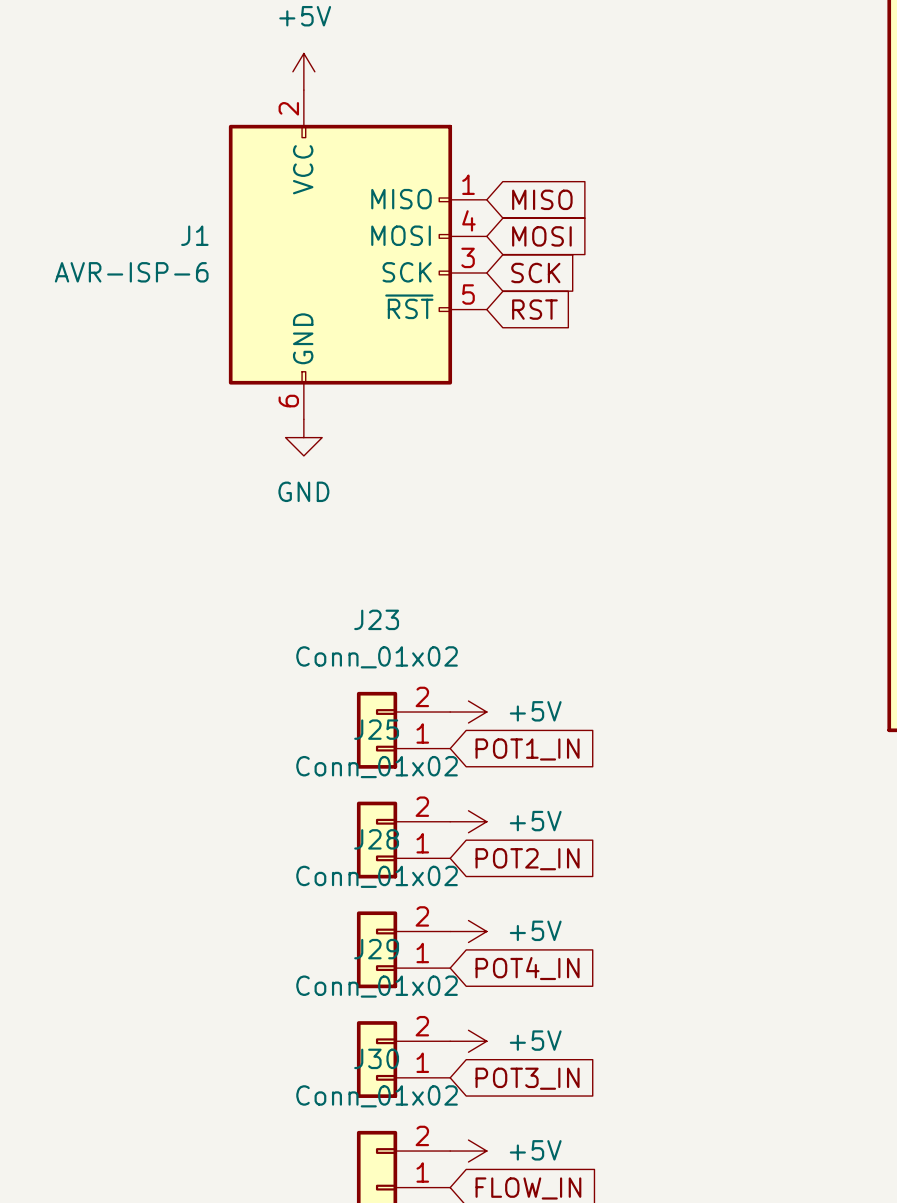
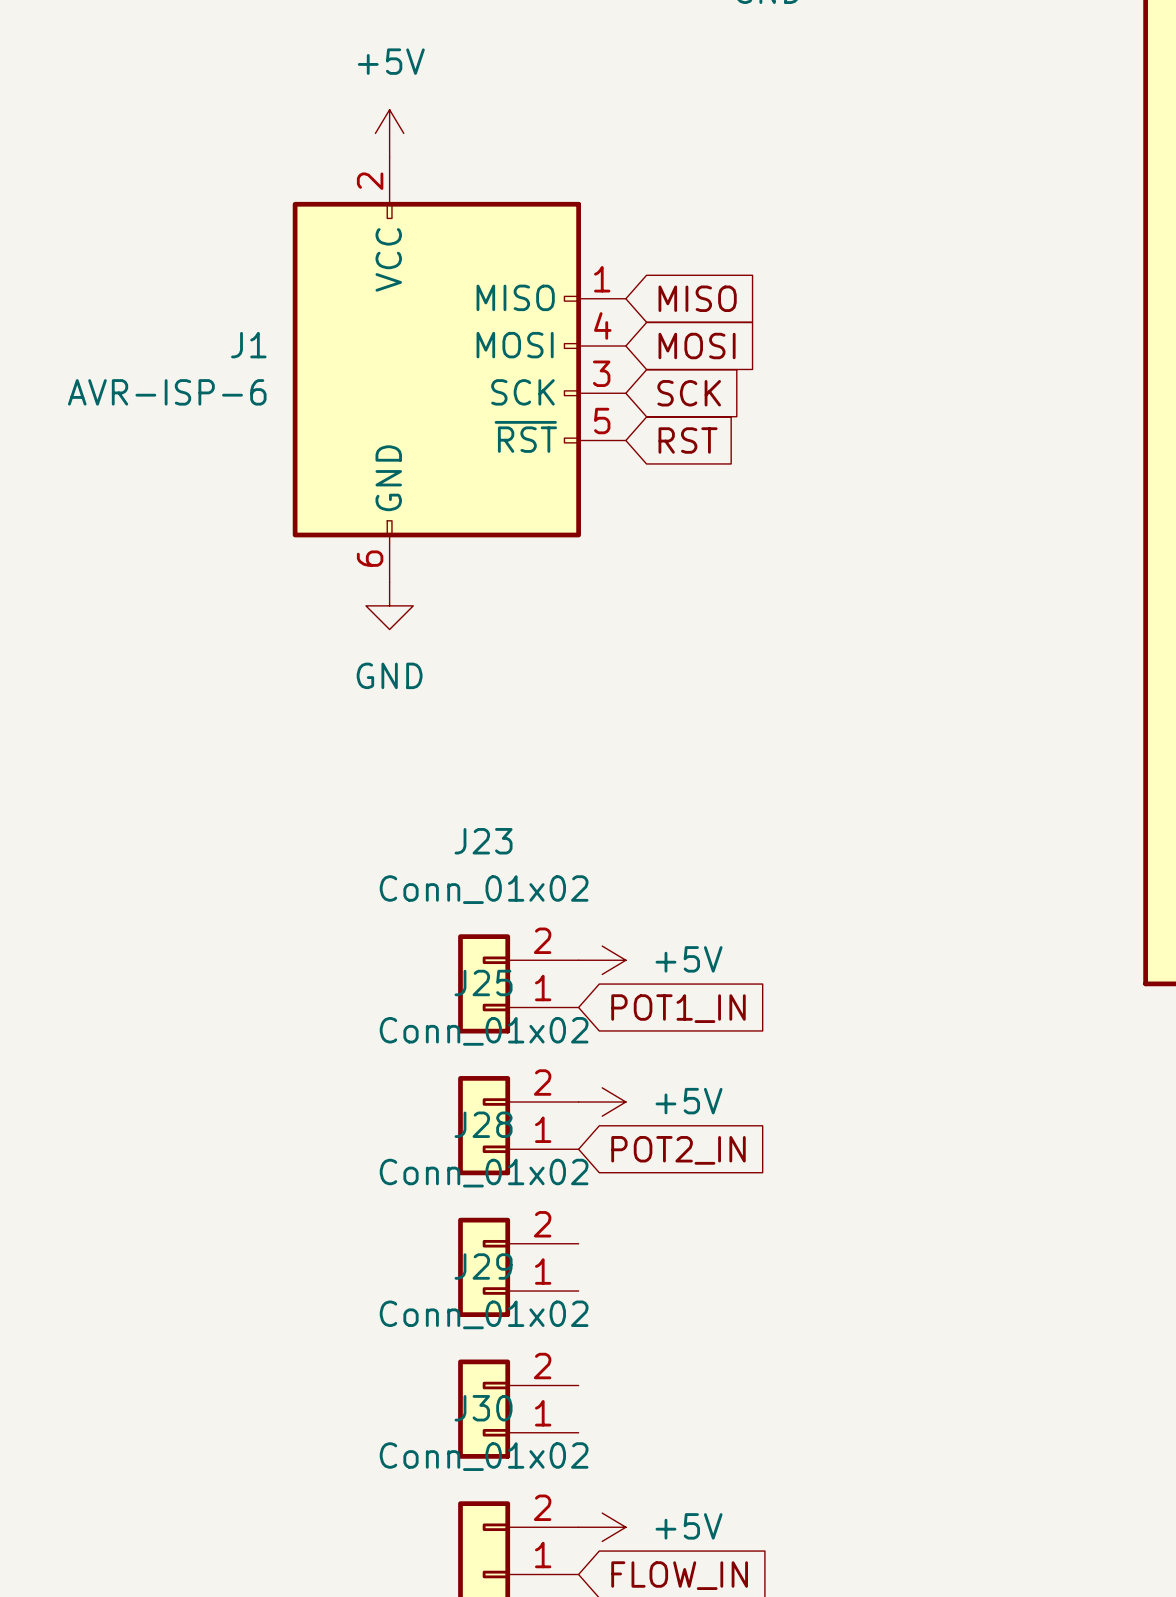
power symbol: +5V (468, 931) -> none
global label: POT4_IN (527, 968) -> none
power symbol: +5V (468, 1041) -> none
global label: POT3_IN (527, 1078) -> none

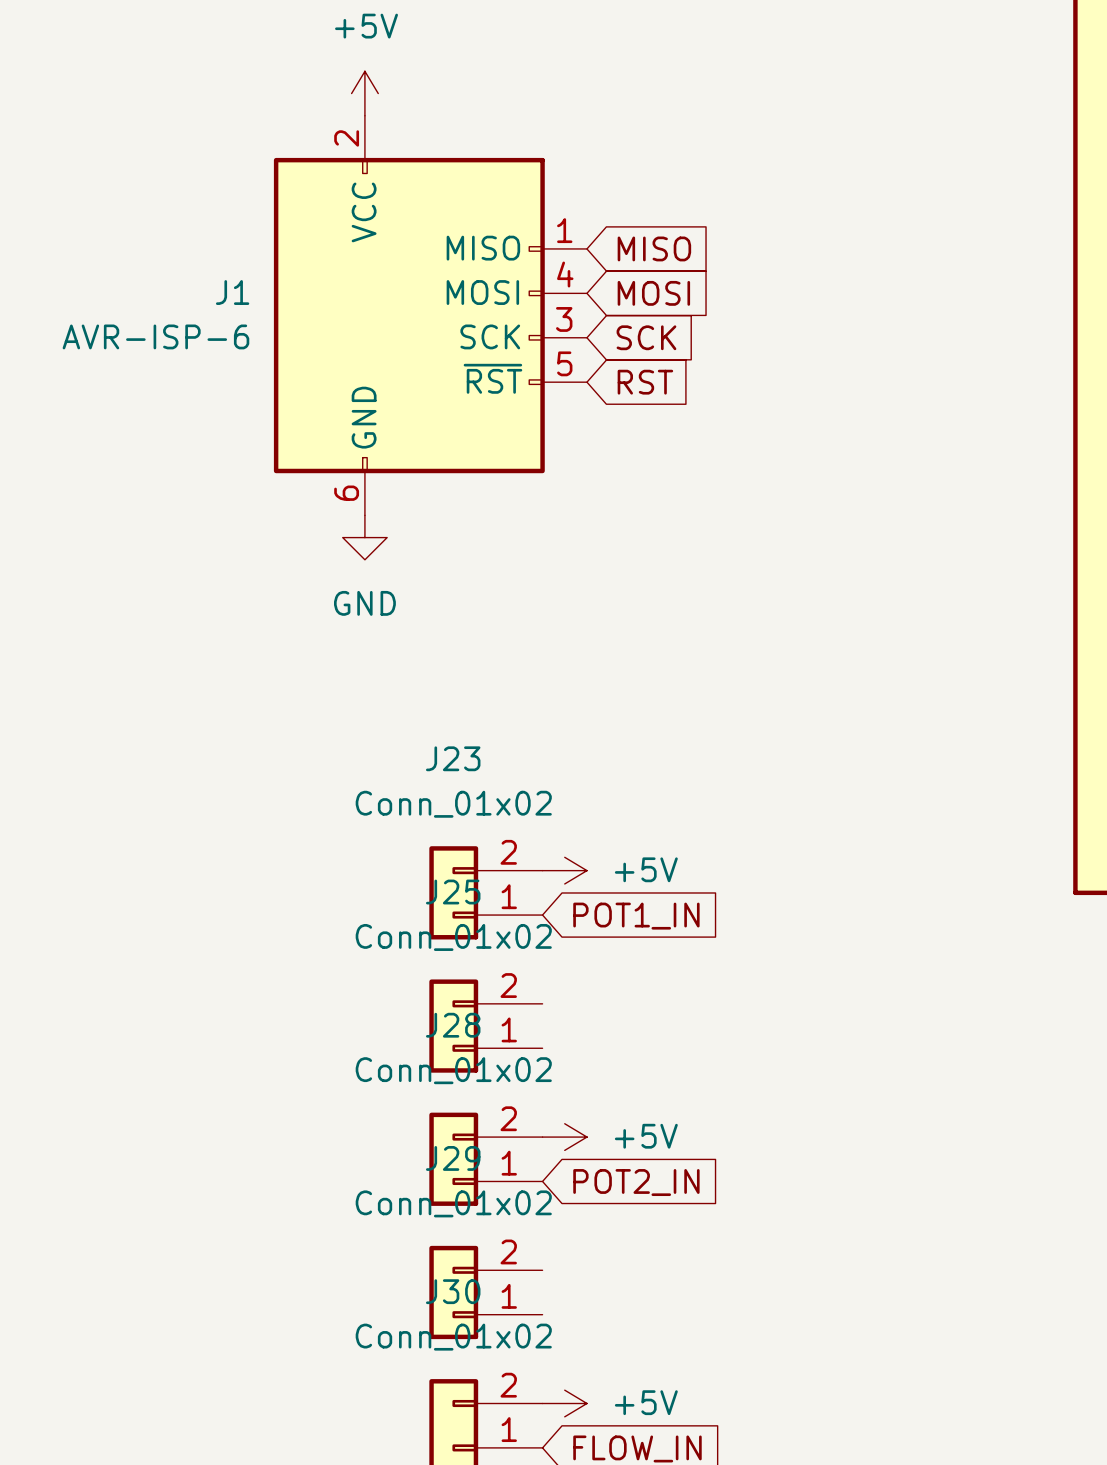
power symbol position: +5V (602, 1102) -> +5V (564, 1137)
global label position: POT2_IN (678, 1150) -> POT2_IN (636, 1182)

